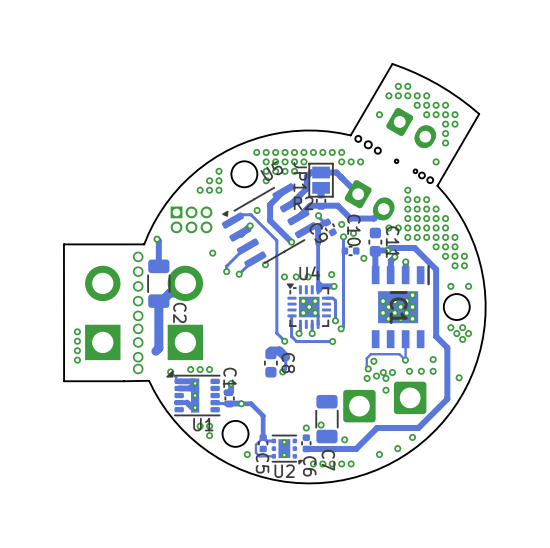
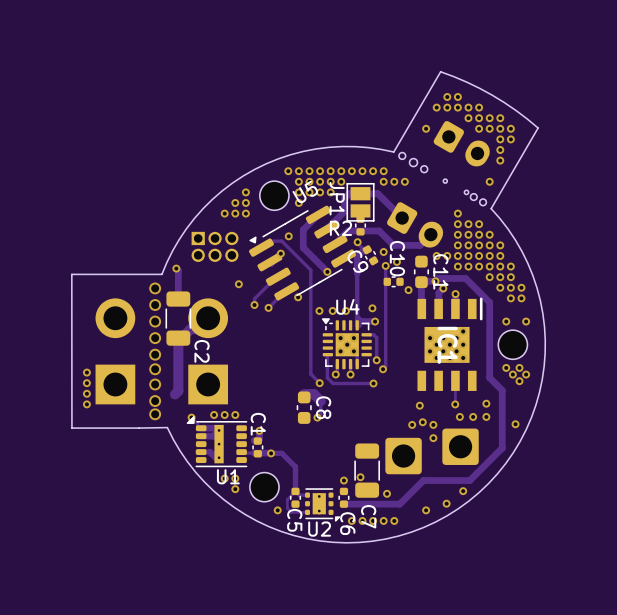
track: (405, 360) (399, 354) (370, 354) (366, 358) (368, 368) -> none
via: (368, 368) -> none
via: (383, 372) -> none
via: (392, 372) -> none

